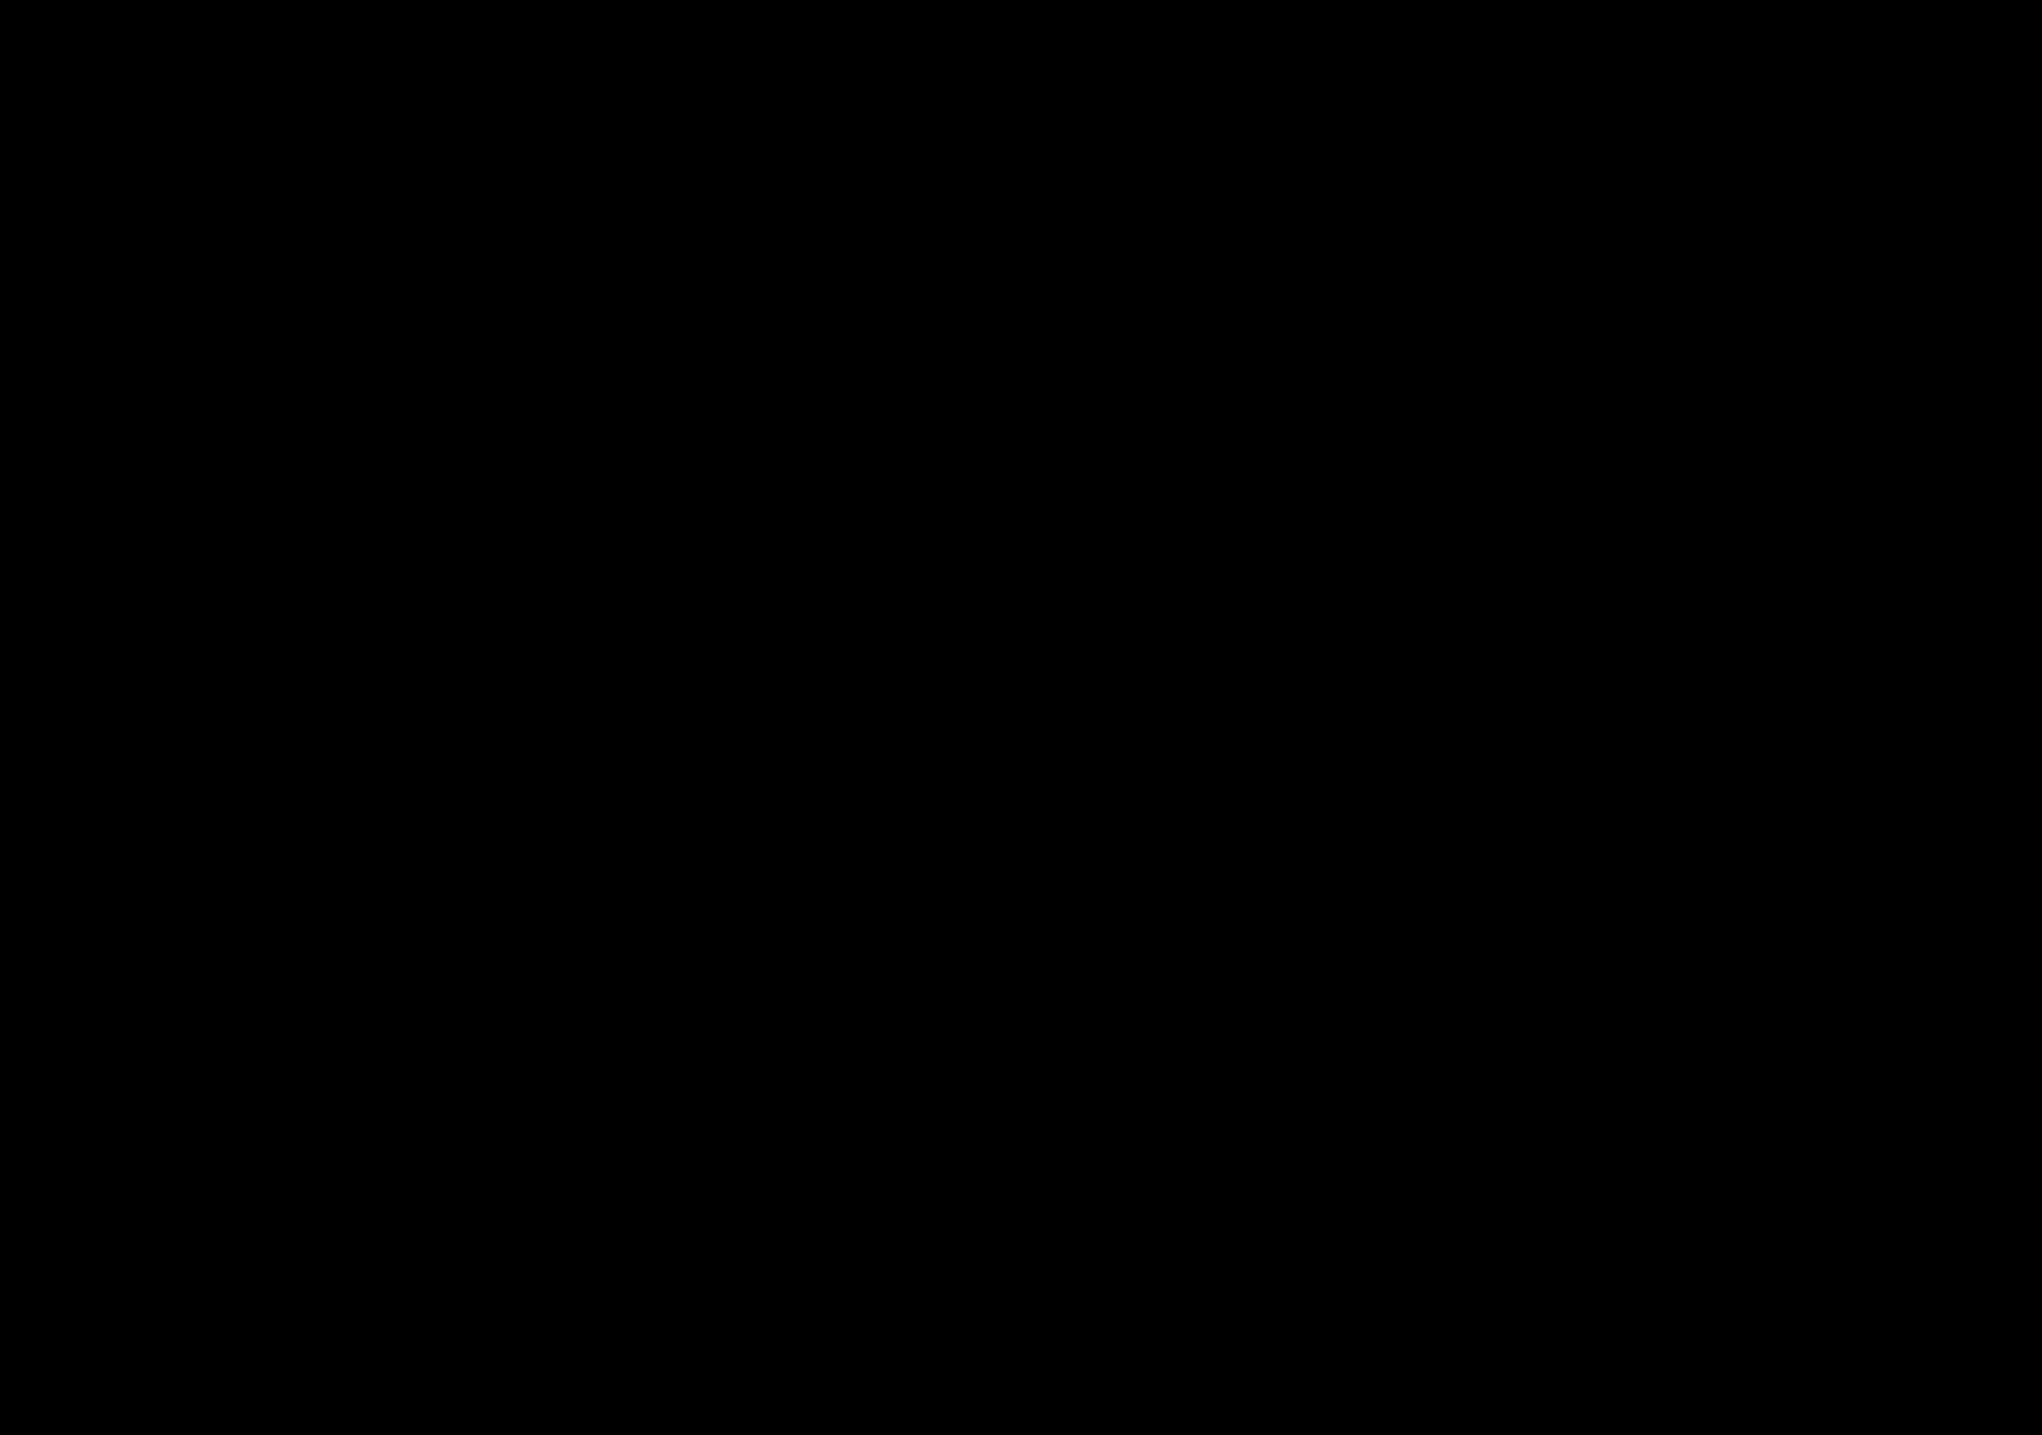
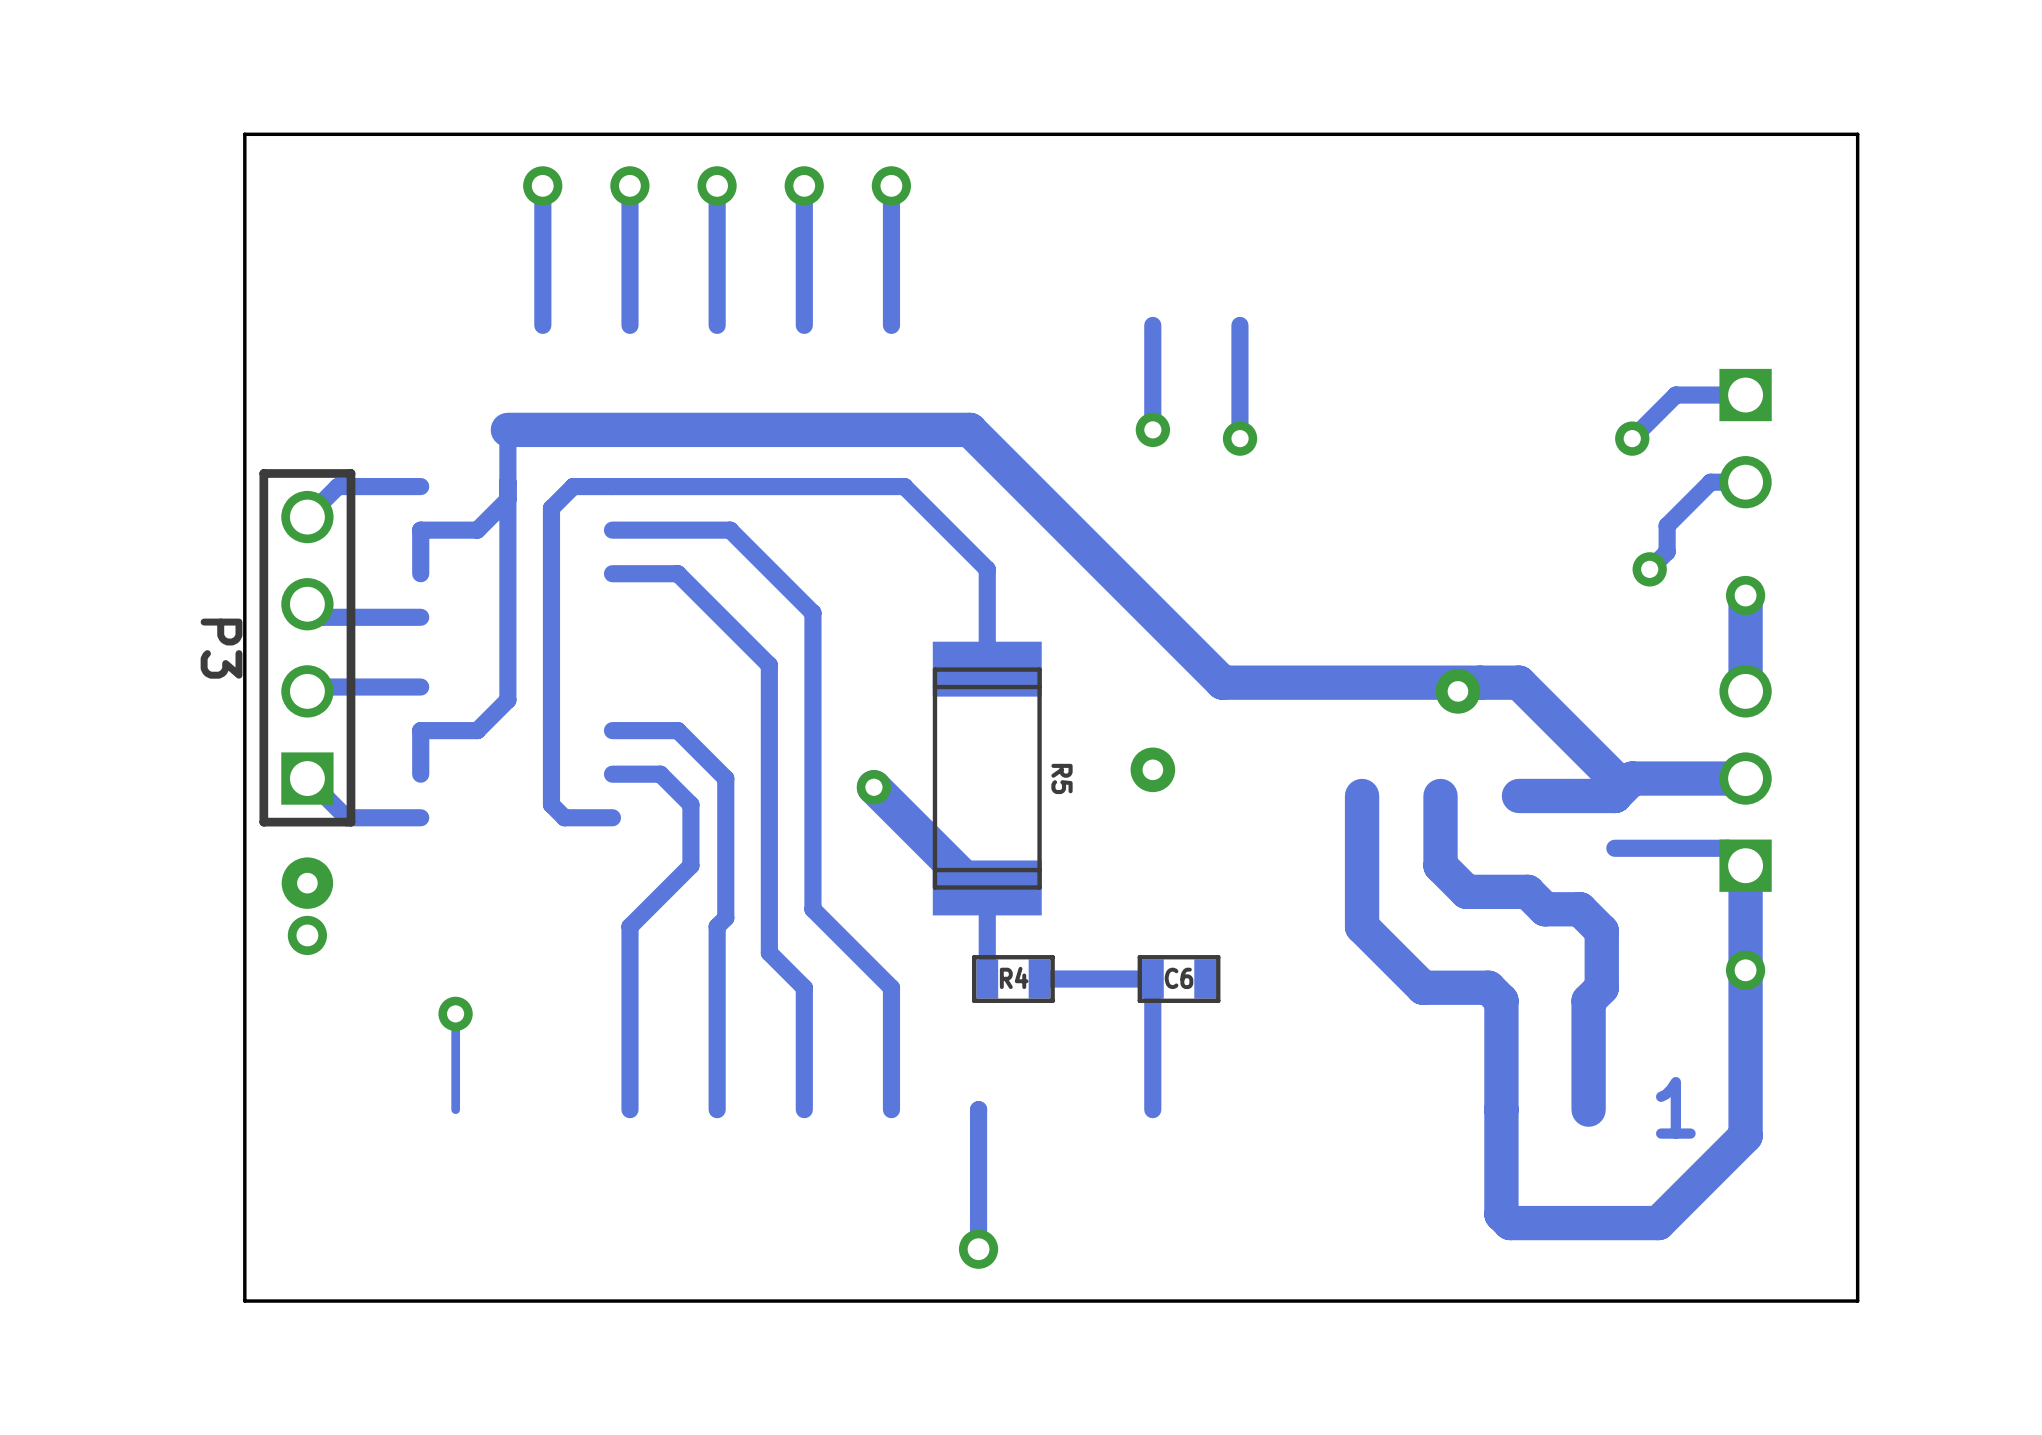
board edge: none -> (1857, 134) (1857, 1301) (244, 1301) (244, 134) (1857, 134)
track: none -> (542, 185) (542, 325)
part: none -> (542, 185)
track: none -> (629, 185) (629, 325)
part: none -> (629, 185)
track: none -> (717, 185) (717, 325)
part: none -> (717, 185)
track: none -> (804, 185) (804, 325)
part: none -> (804, 185)
track: none -> (891, 185) (891, 325)
part: none -> (891, 185)
track: none -> (1152, 325) (1152, 429)
track: none -> (1239, 325) (1239, 438)
track: none -> (1745, 395) (1675, 395) (1632, 438)
via: none -> (1152, 429)
via: none -> (1240, 438)
via: none -> (1632, 438)
part: none -> (1745, 438)
track: none -> (1745, 482) (1710, 482) (1667, 525) (1667, 551) (1649, 569)
track: none -> (420, 486) (337, 486) (307, 517)
track: none -> (507, 499) (477, 530) (420, 530) (420, 573)
track: none -> (612, 530) (730, 530) (812, 612) (812, 909) (891, 987) (891, 1109)
via: none -> (1649, 569)
track: none -> (612, 573) (677, 573) (769, 665) (769, 952) (804, 987) (804, 1109)
track: none -> (1745, 595) (1745, 691)
part: none -> (1745, 595)
track: none -> (307, 604) (320, 617) (420, 617)
P3: none -> (307, 647)
track: none -> (987, 669) (987, 569) (904, 486) (573, 486) (551, 508) (551, 804) (564, 817) (612, 817)
track: none -> (420, 687) (311, 687) (307, 691)
via: none -> (1457, 691)
track: none -> (612, 730) (677, 730) (725, 778) (725, 918) (717, 926) (717, 1109)
via: none -> (1152, 769)
track: none -> (420, 774) (420, 730) (477, 730) (507, 700) (507, 429) (969, 429) (1222, 682) (1518, 682) (1614, 778) (1614, 795)
track: none -> (612, 774) (660, 774) (690, 804) (690, 865) (629, 926) (629, 1109)
track: none -> (307, 778) (346, 817) (420, 817)
R5: none -> (987, 778)
track: none -> (1745, 778) (1632, 778) (1614, 795)
part: none -> (1745, 778)
track: none -> (873, 787) (974, 887) (987, 887) (987, 979)
via: none -> (873, 787)
track: none -> (1362, 795) (1362, 926) (1423, 987) (1488, 987)
track: none -> (1440, 795) (1440, 865) (1466, 891) (1527, 891) (1545, 909) (1579, 909) (1601, 931) (1601, 987)
track: none -> (1614, 795) (1518, 795)
track: none -> (1614, 848) (1728, 848) (1745, 865) (1745, 1135) (1658, 1223) (1510, 1223) (1501, 1214) (1501, 1000)
via: none -> (307, 883)
part: none -> (307, 935)
part: none -> (1745, 970)
R4: none -> (1013, 979)
track: none -> (1039, 979) (1152, 979) (1152, 1109)
C6: none -> (1179, 979)
track: none -> (1588, 1000) (1588, 1109)
track: none -> (455, 1013) (455, 1109)
via: none -> (455, 1013)
text: none -> 1 (1675, 1107)
track: none -> (978, 1109) (978, 1249)
part: none -> (978, 1249)

